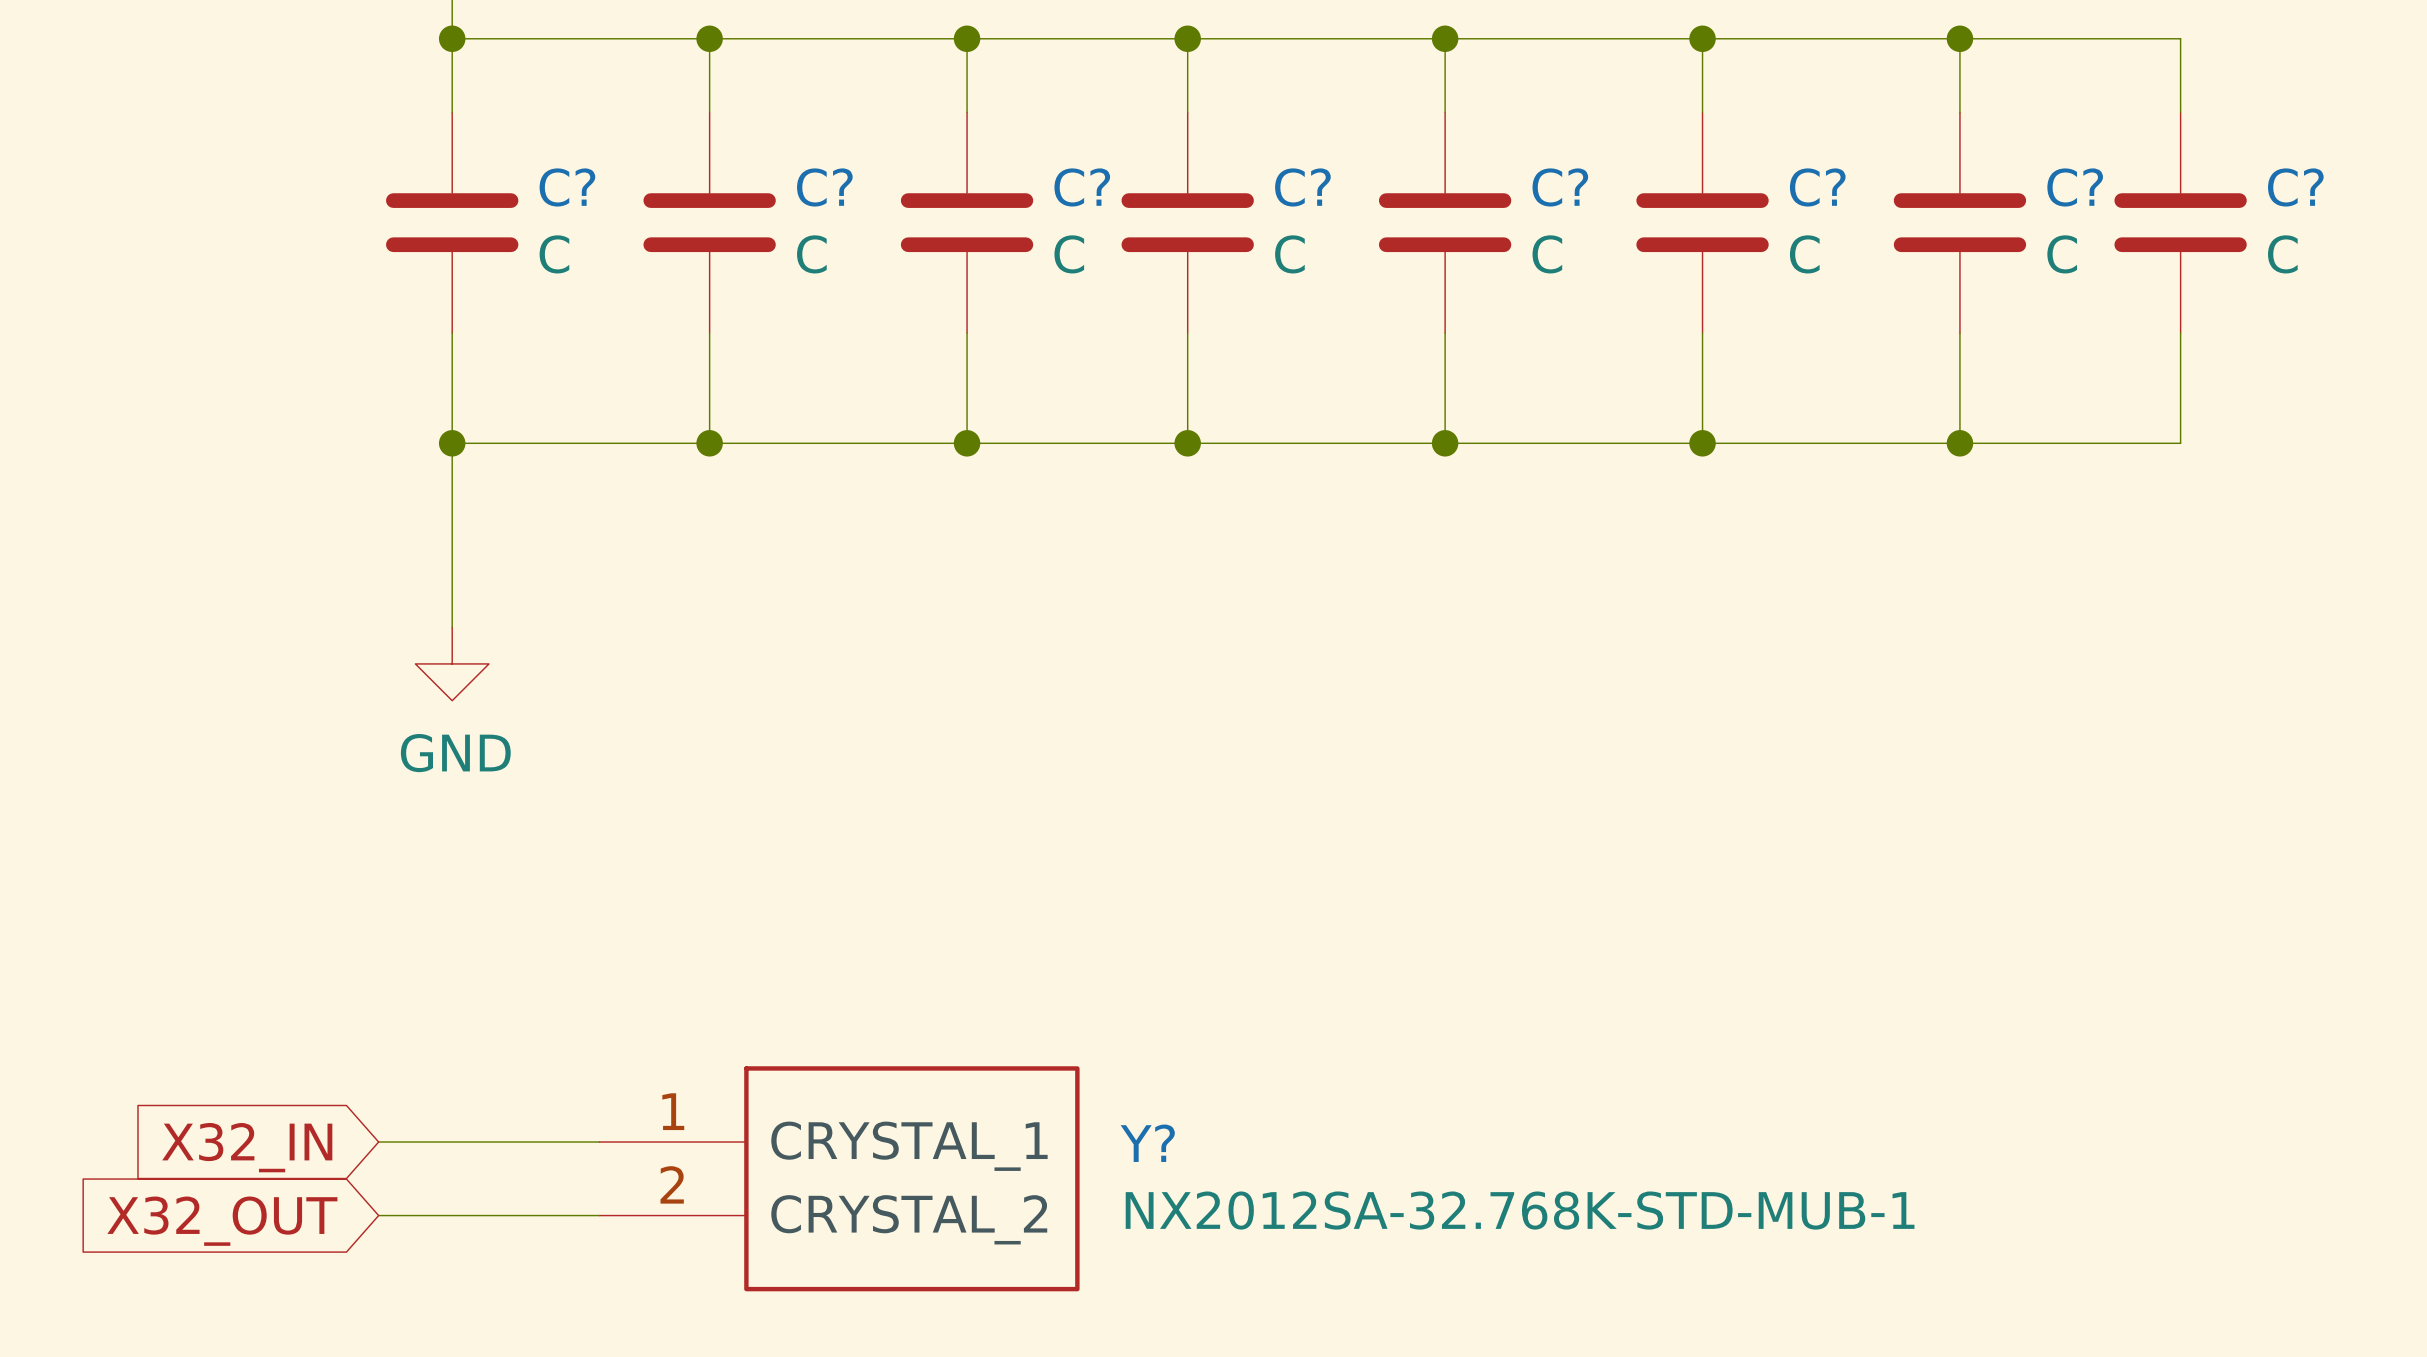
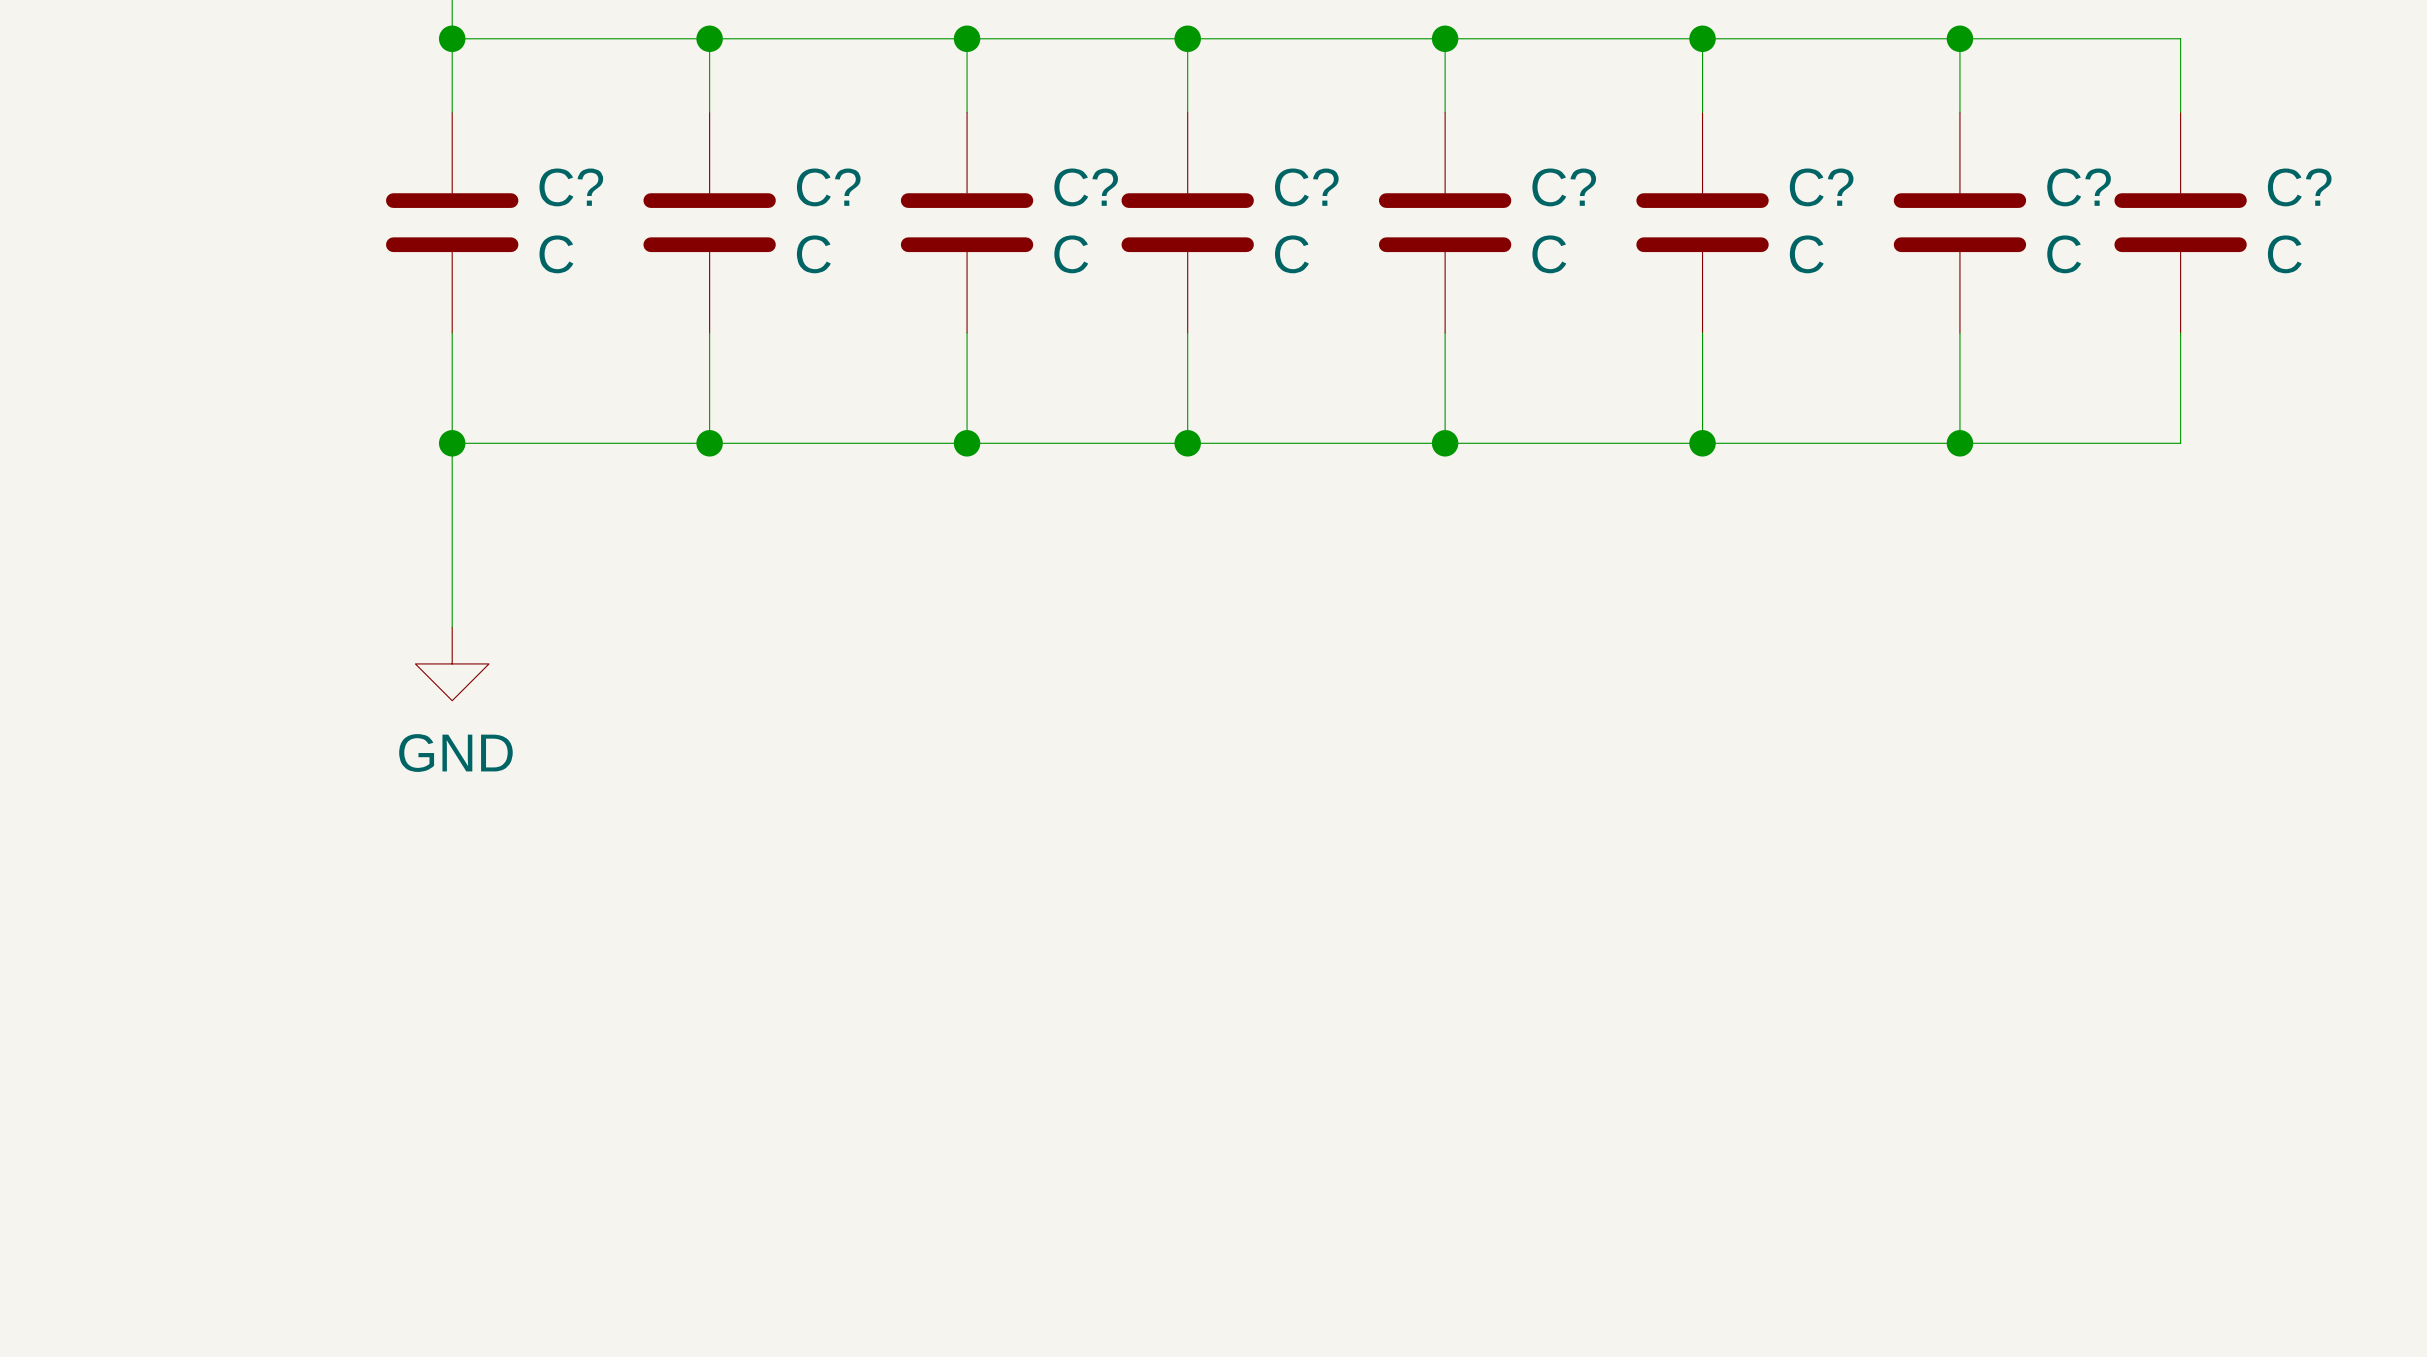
wire: (378, 1142) (599, 1142) -> none
global label: X32_IN (247, 1147) -> none
Y?: NX2012SA-32.768K-STD-MUB-1 (839, 1178) -> none
wire: (378, 1215) (599, 1215) -> none
global label: X32_OUT (222, 1221) -> none

